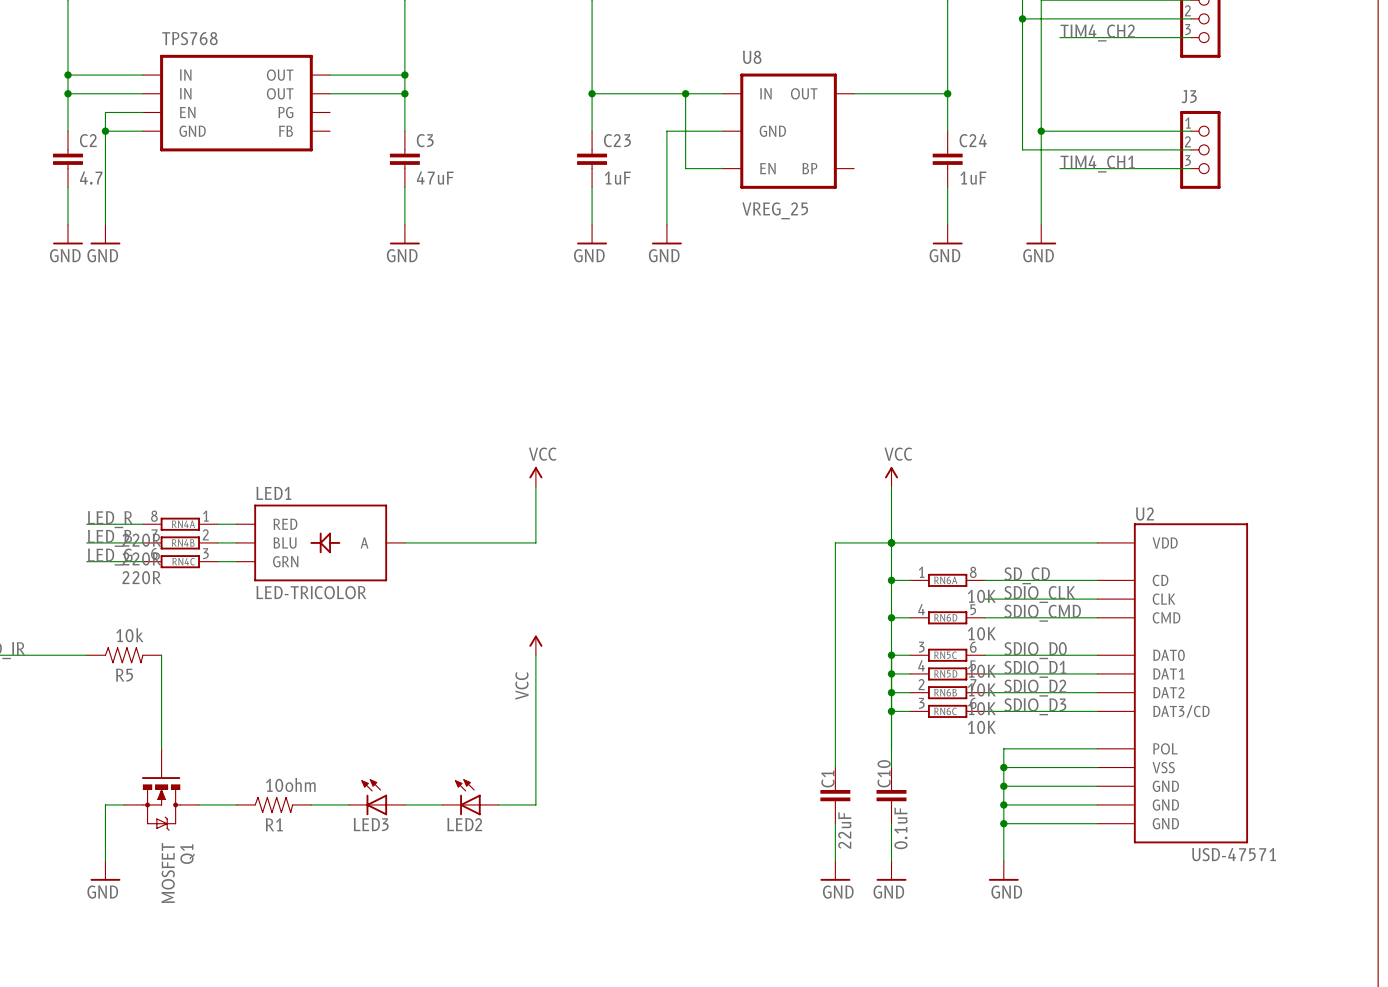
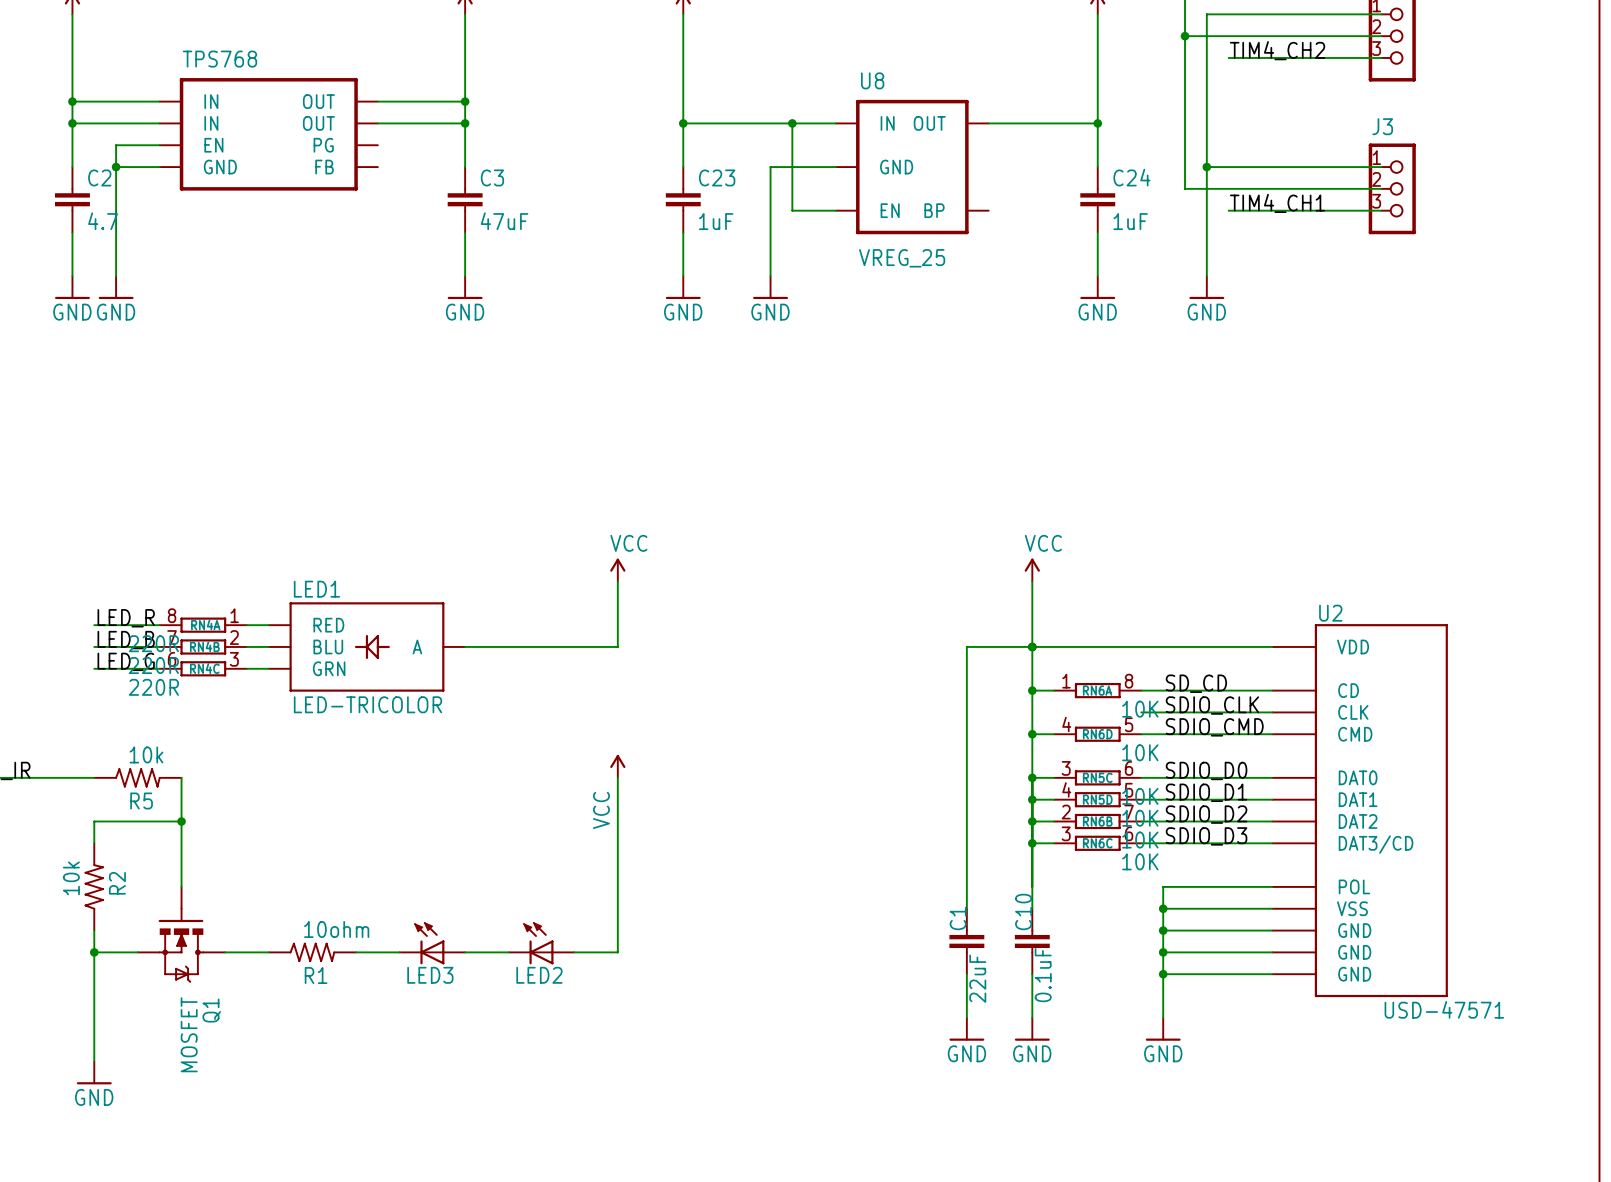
wire: none -> (181, 821) (94, 821) (94, 843)
junction: none -> (181, 821)
R2: none -> 10k (94, 886)
wire: none -> (94, 930) (94, 1061)
junction: none -> (94, 952)
wire: (105, 804) (105, 861) -> (116, 952) (94, 952)
power symbol position: GND (105, 870) -> GND (94, 1072)

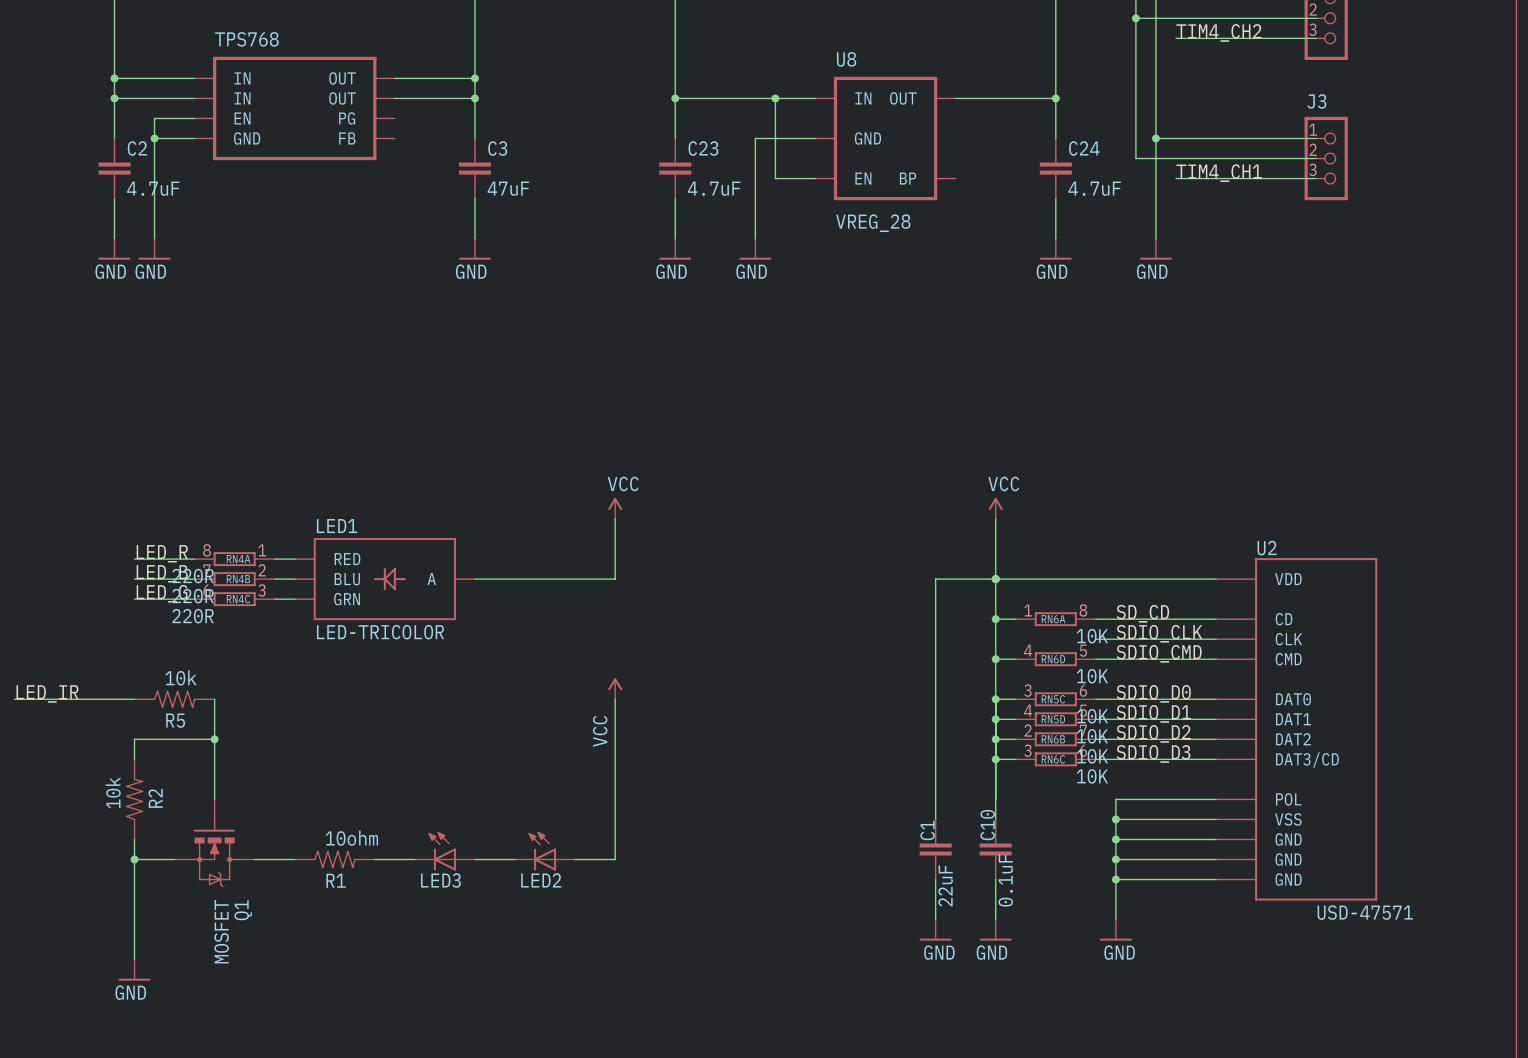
C2 value: 4.7 (103, 221) -> 4.7uF (153, 188)
C23 value: 1uF (716, 221) -> 4.7uF (714, 188)
C24 value: 1uF (1130, 221) -> 4.7uF (1094, 188)
U8 value: VREG_25 (902, 258) -> VREG_28 (873, 223)

